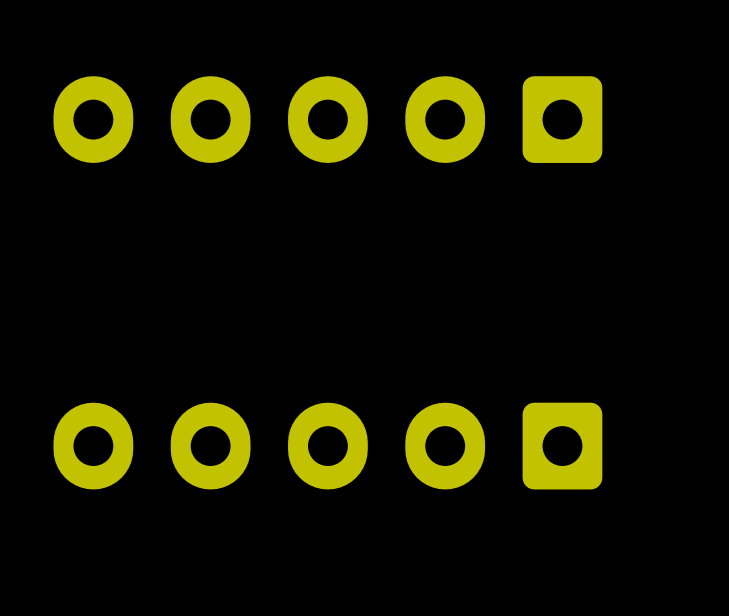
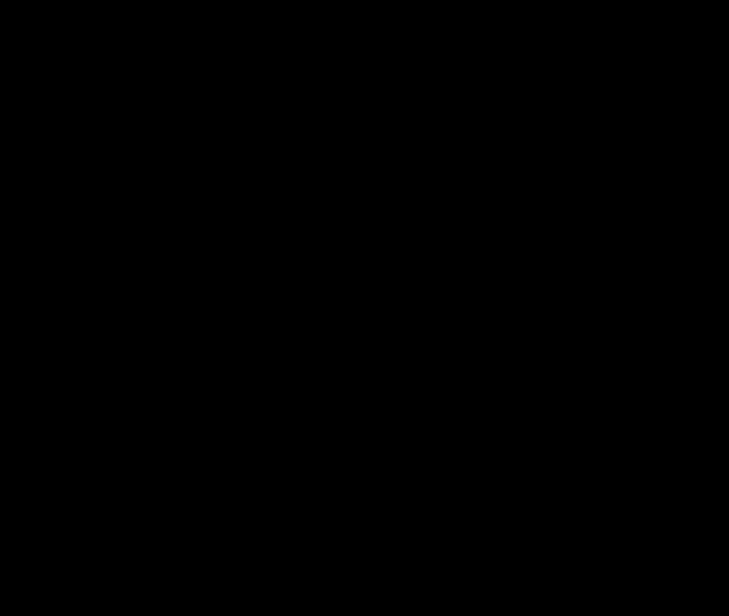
part: (327, 119) -> none
part: (327, 446) -> none

